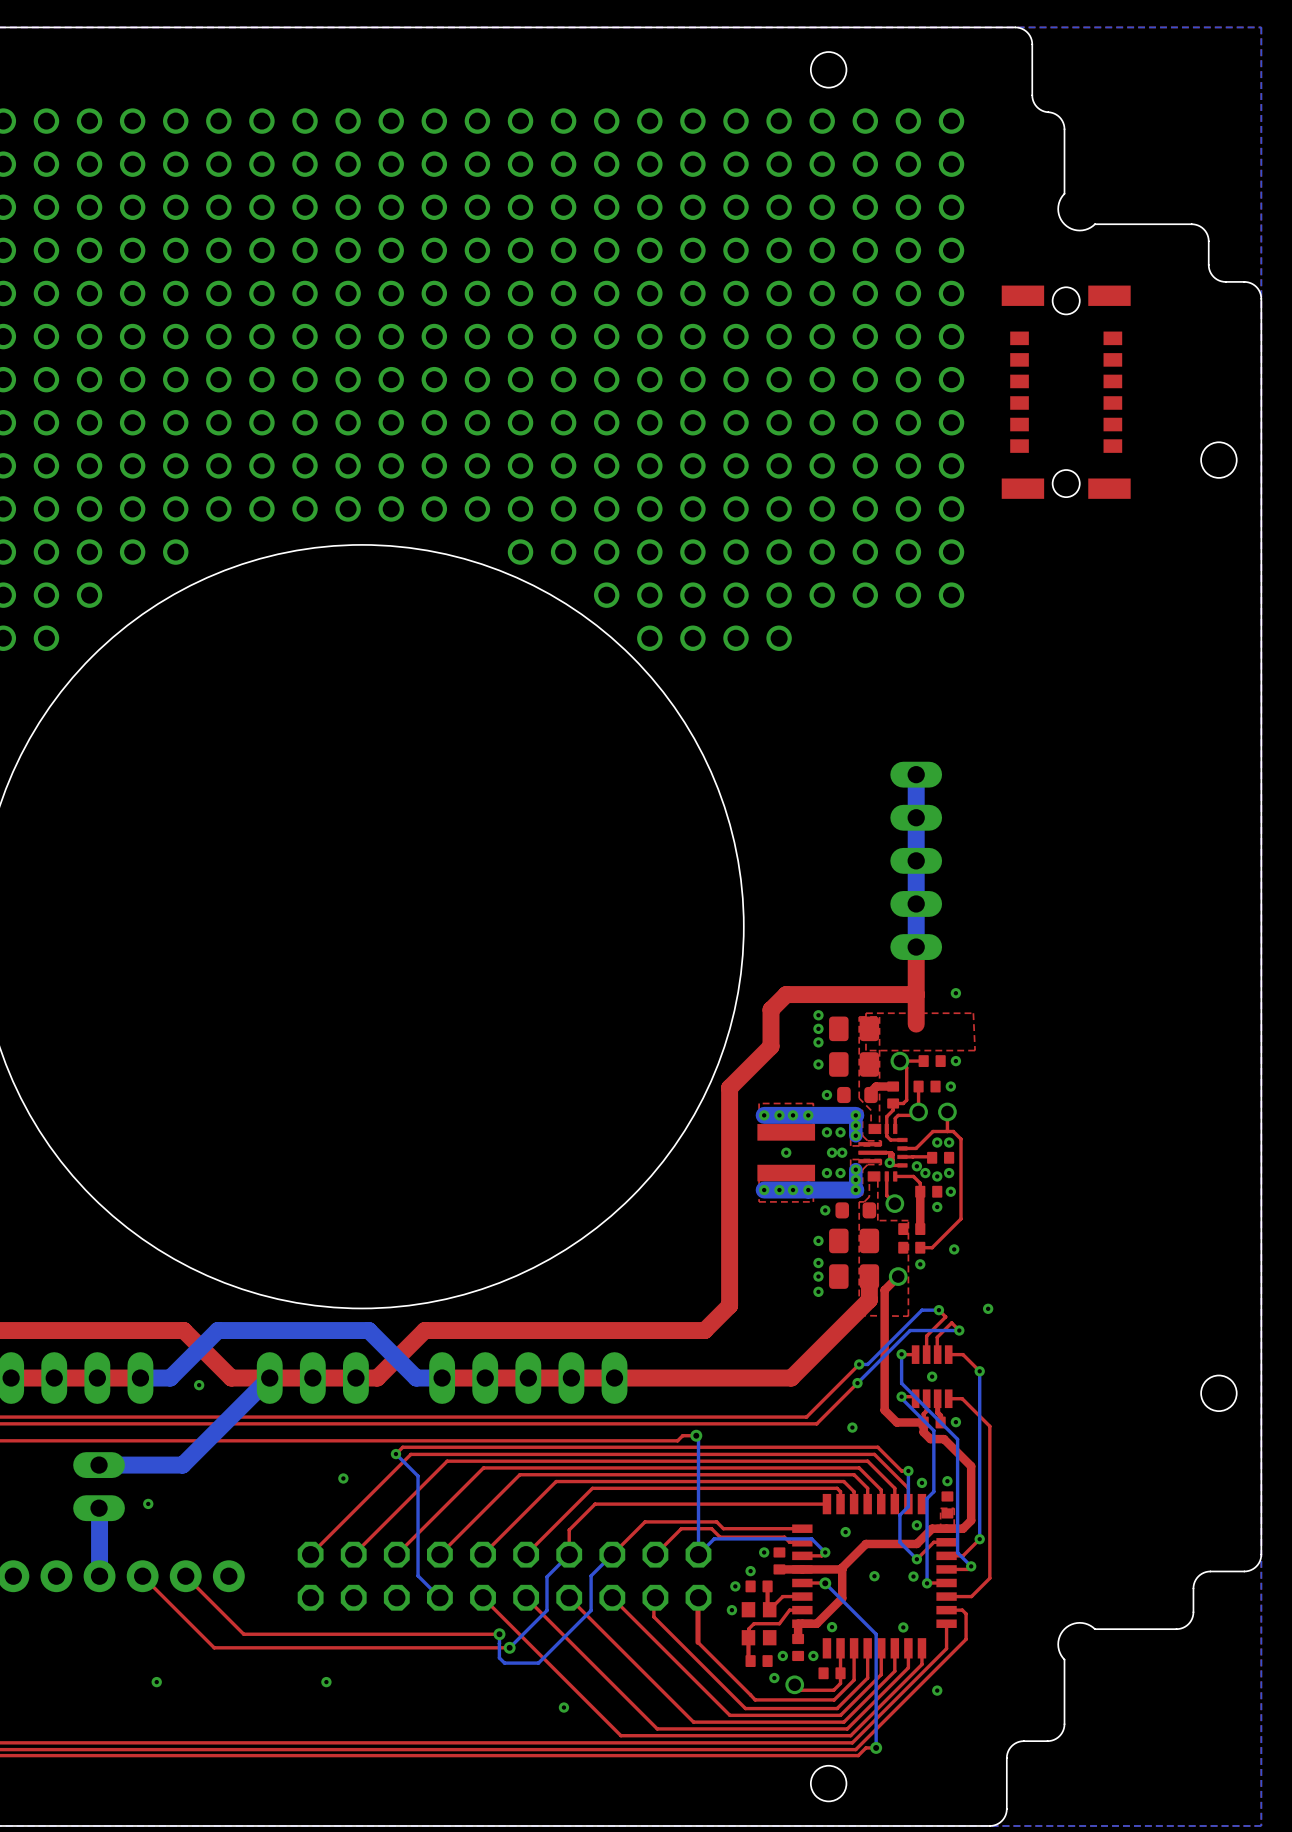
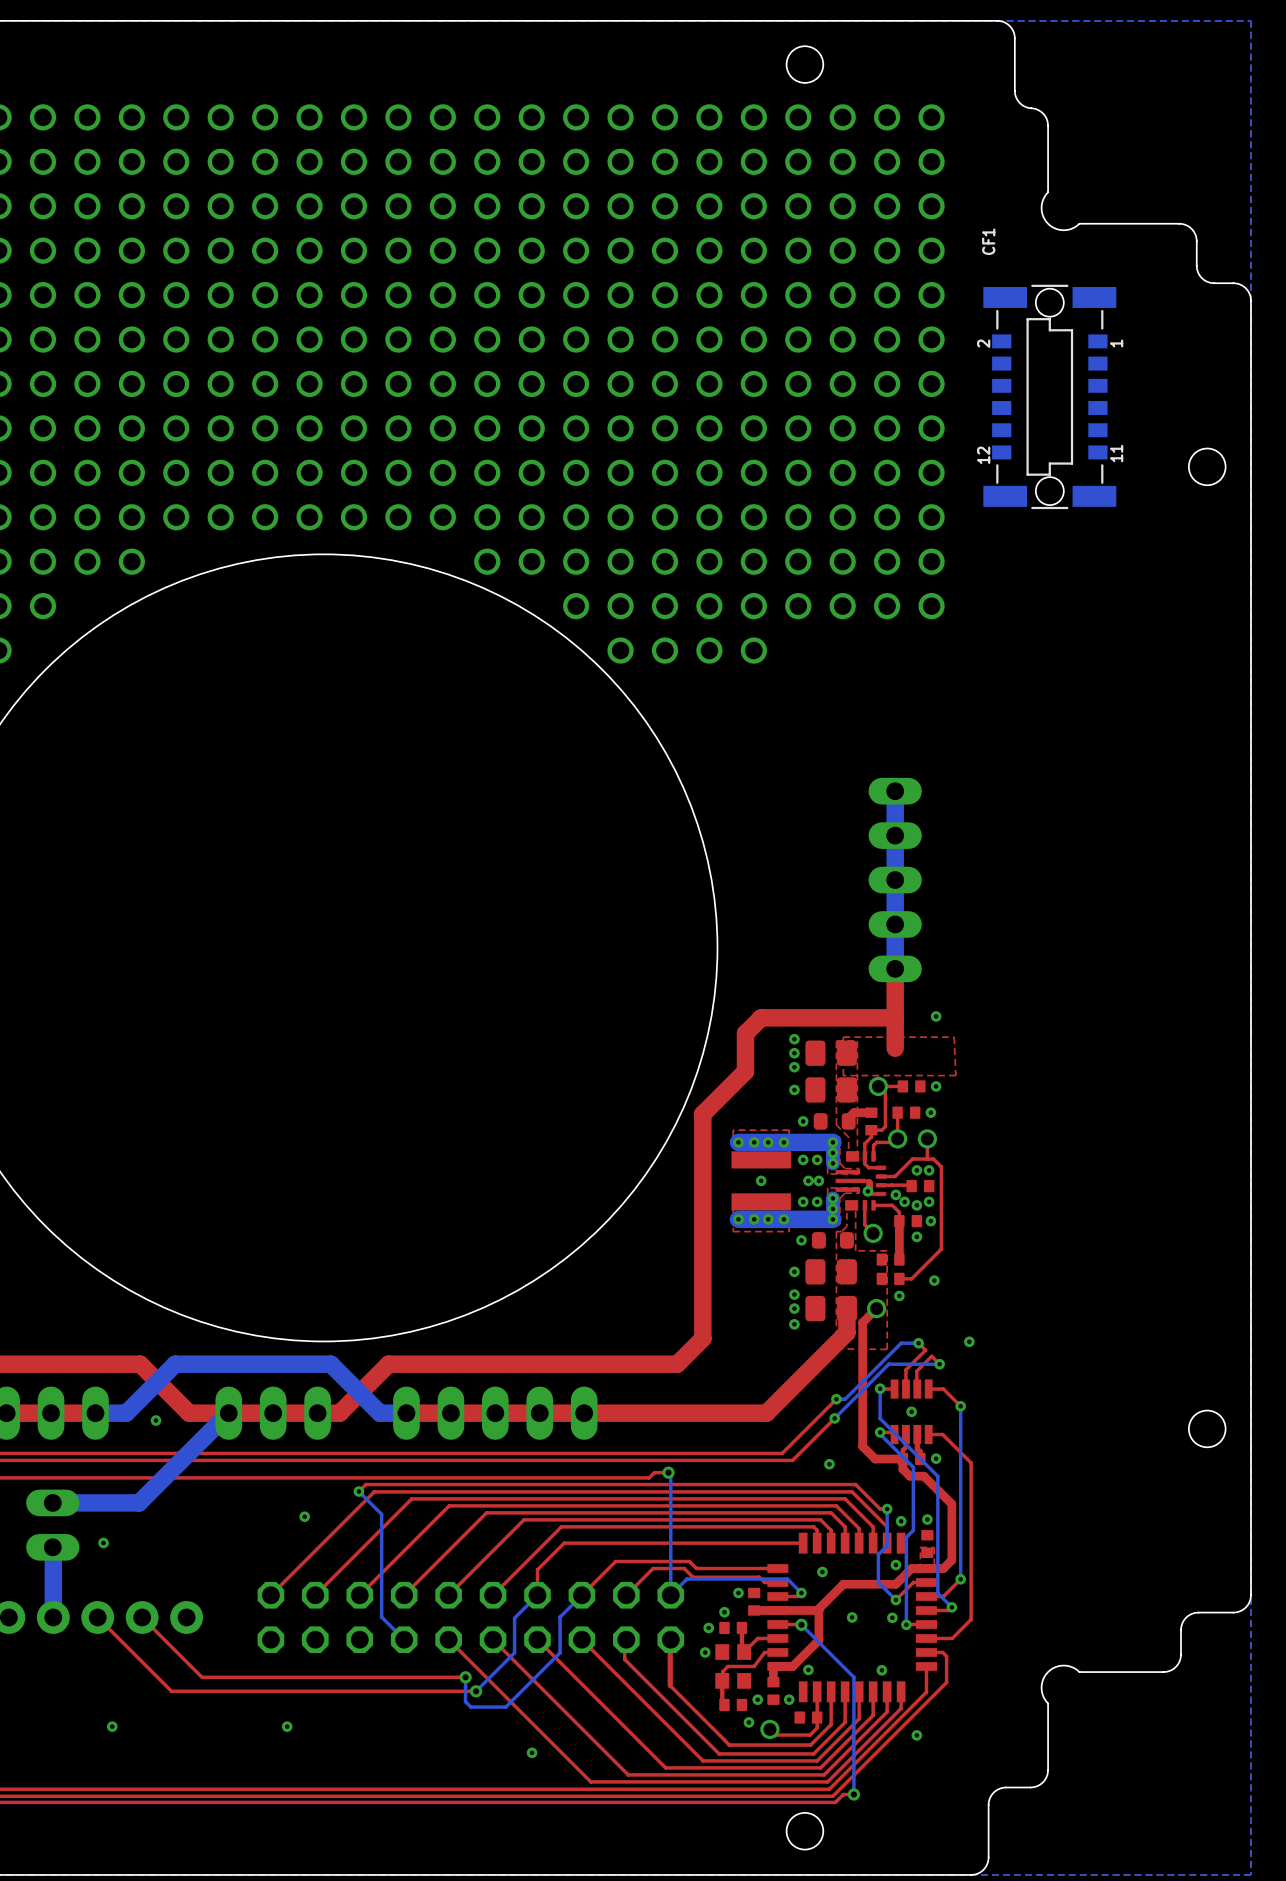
CF1 side: top (1066, 392) -> bottom (1049, 396)

